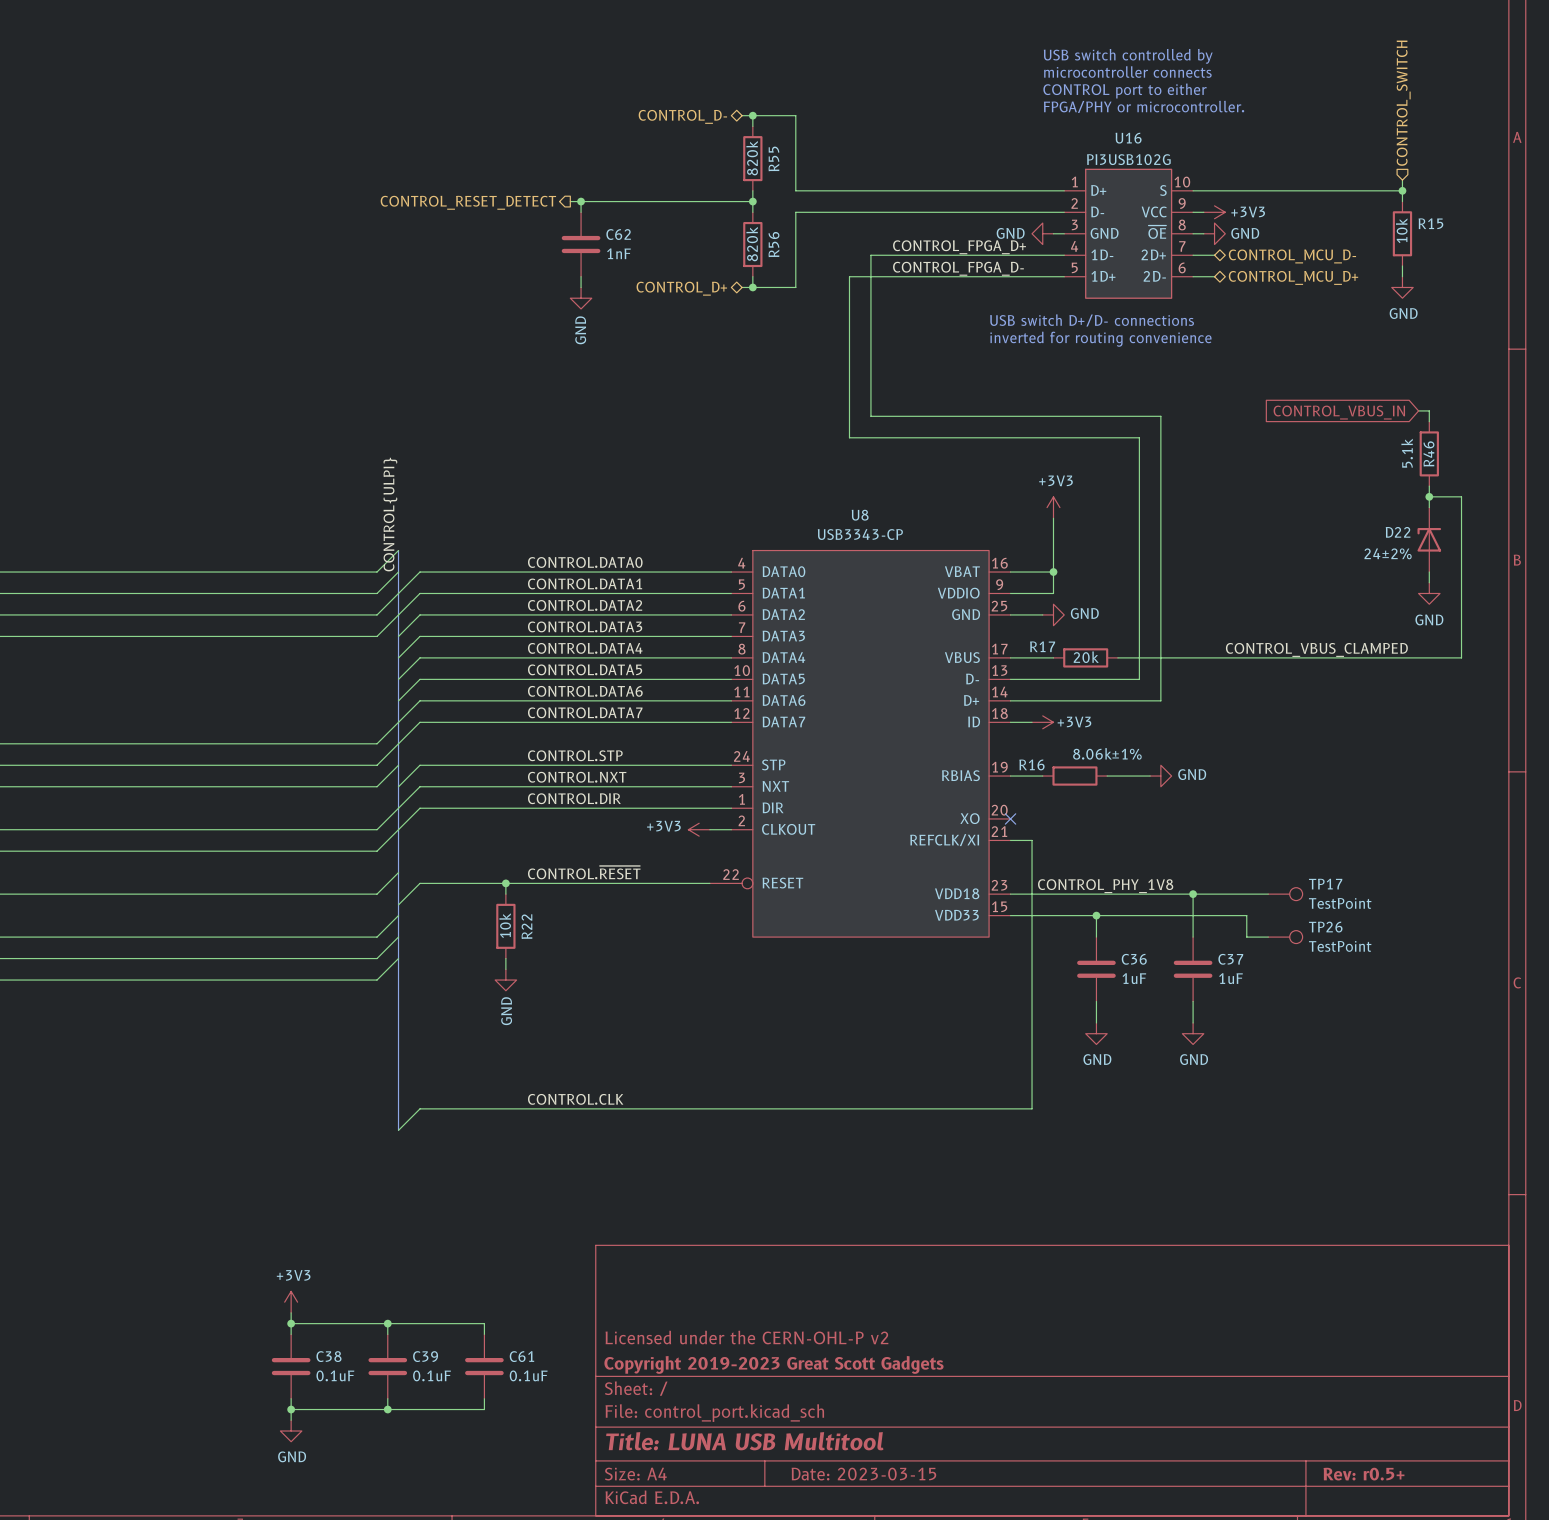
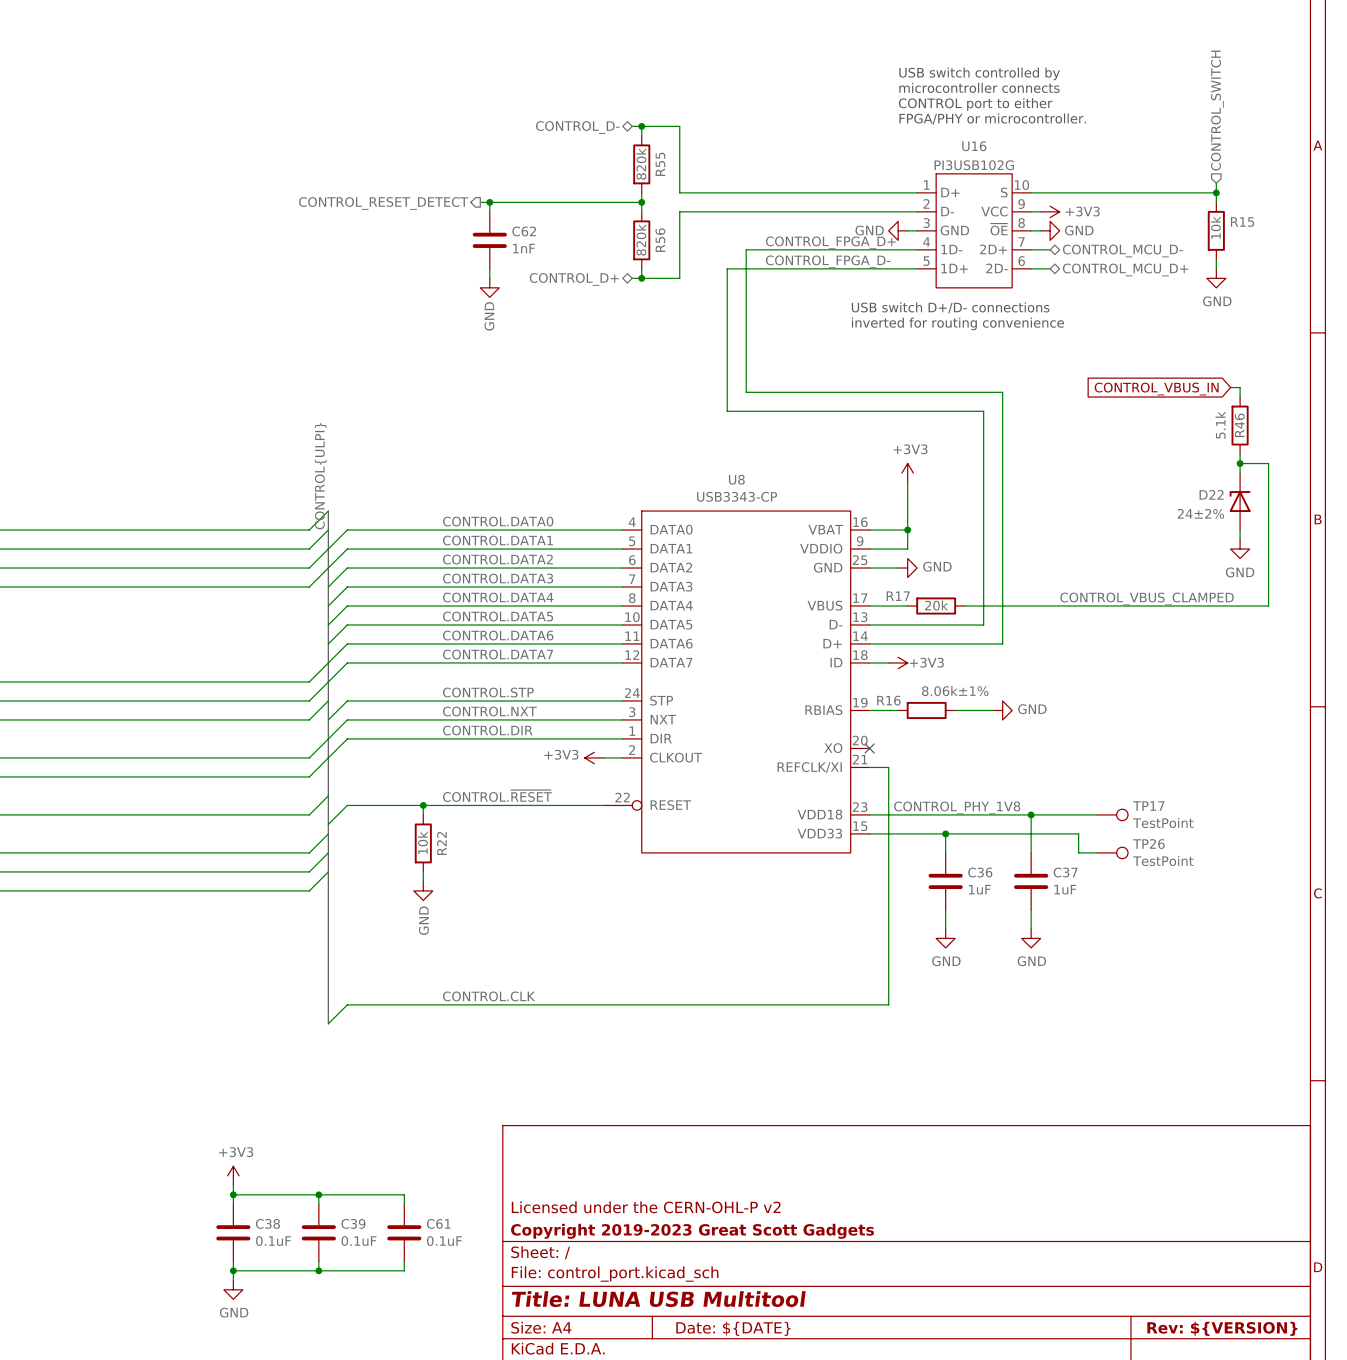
title block: Date: 2023-03-15 (863, 1474) -> Date: ${DATE} (733, 1328)
title block: Rev: r0.5+ (1363, 1474) -> Rev: ${VERSION} (1222, 1328)

